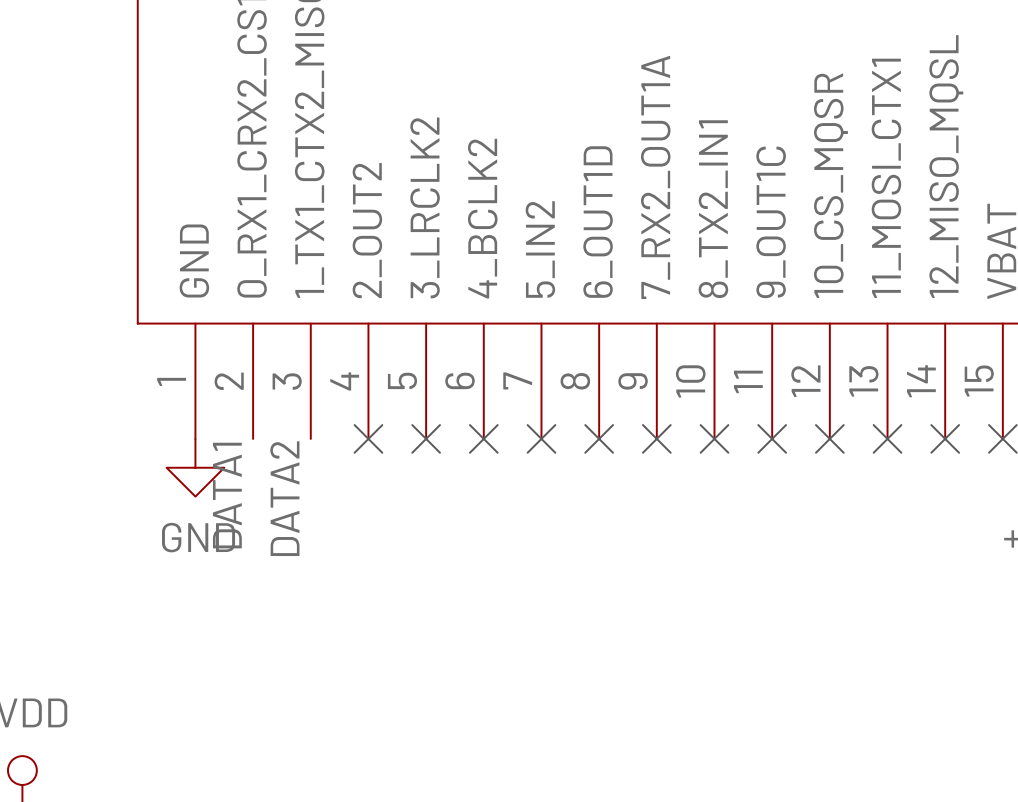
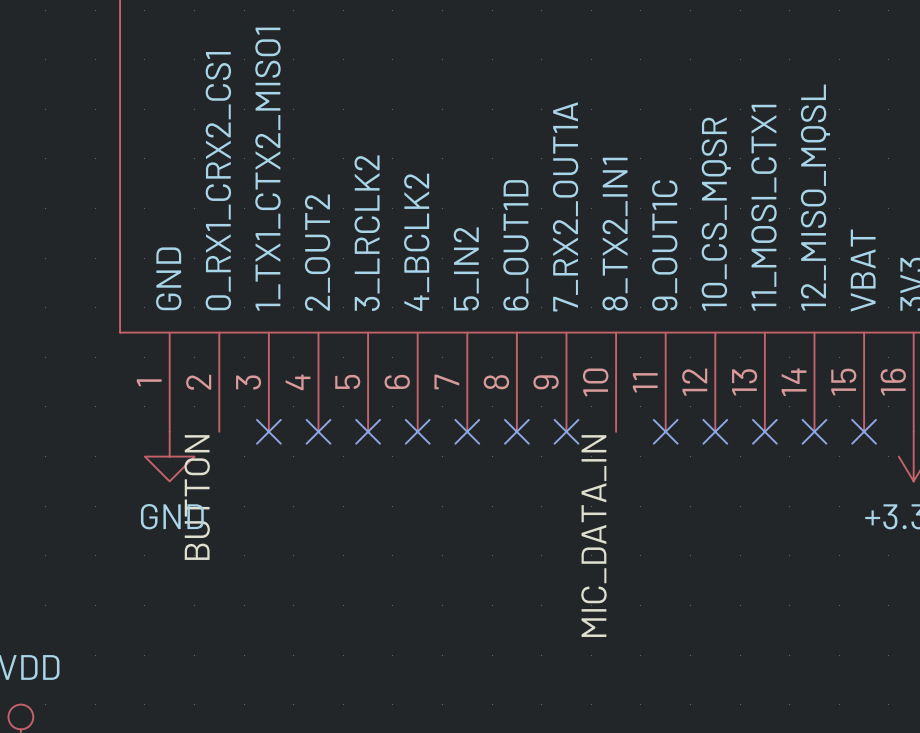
no-connect mark: none -> (268, 431)
no-connect mark: (714, 438) -> none
label: DATA1 (227, 495) -> BUTTON (197, 497)
label: DATA2 (284, 498) -> none
label: none -> MIC_DATA_IN (593, 536)

